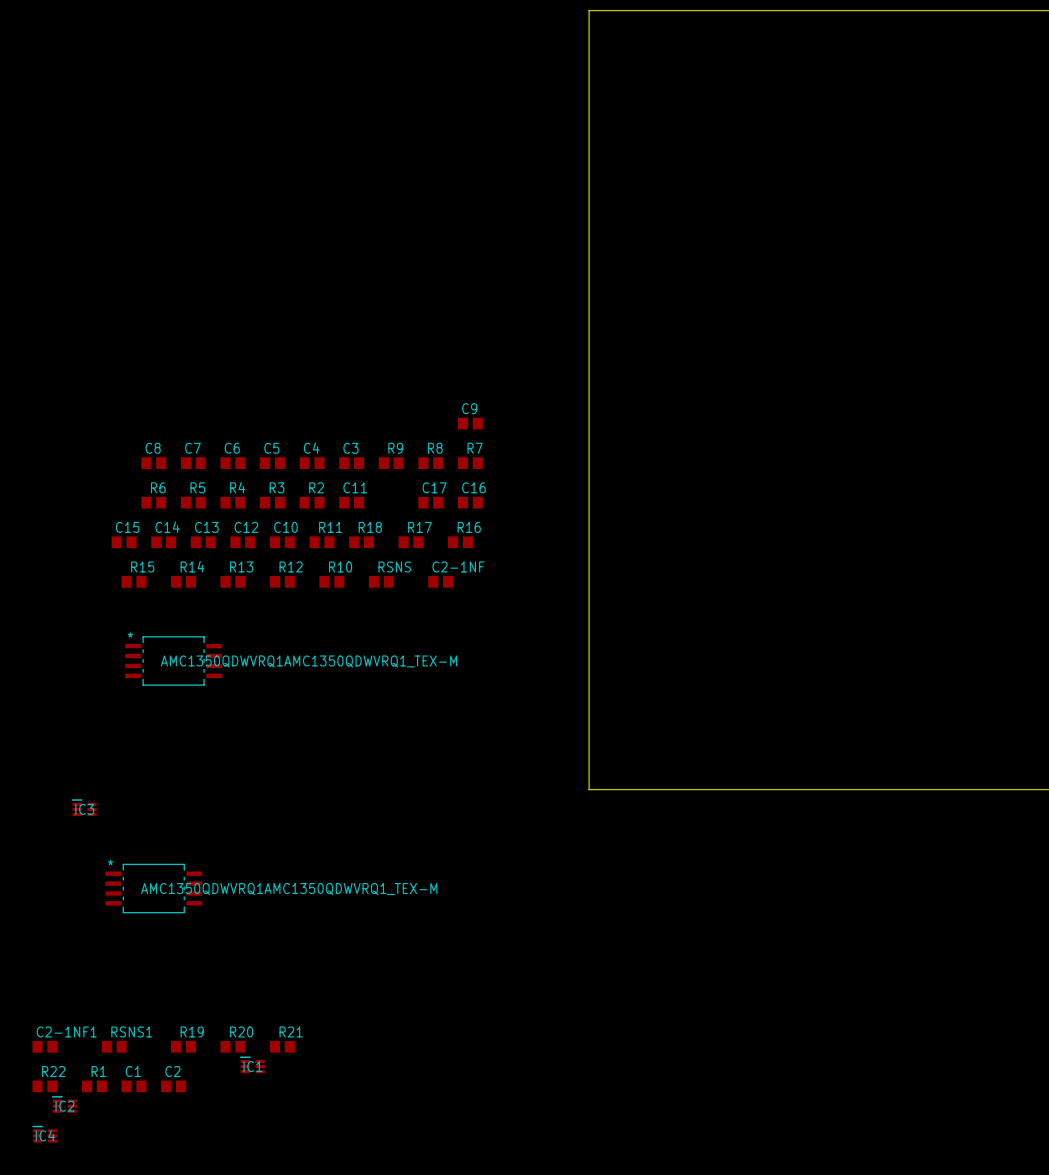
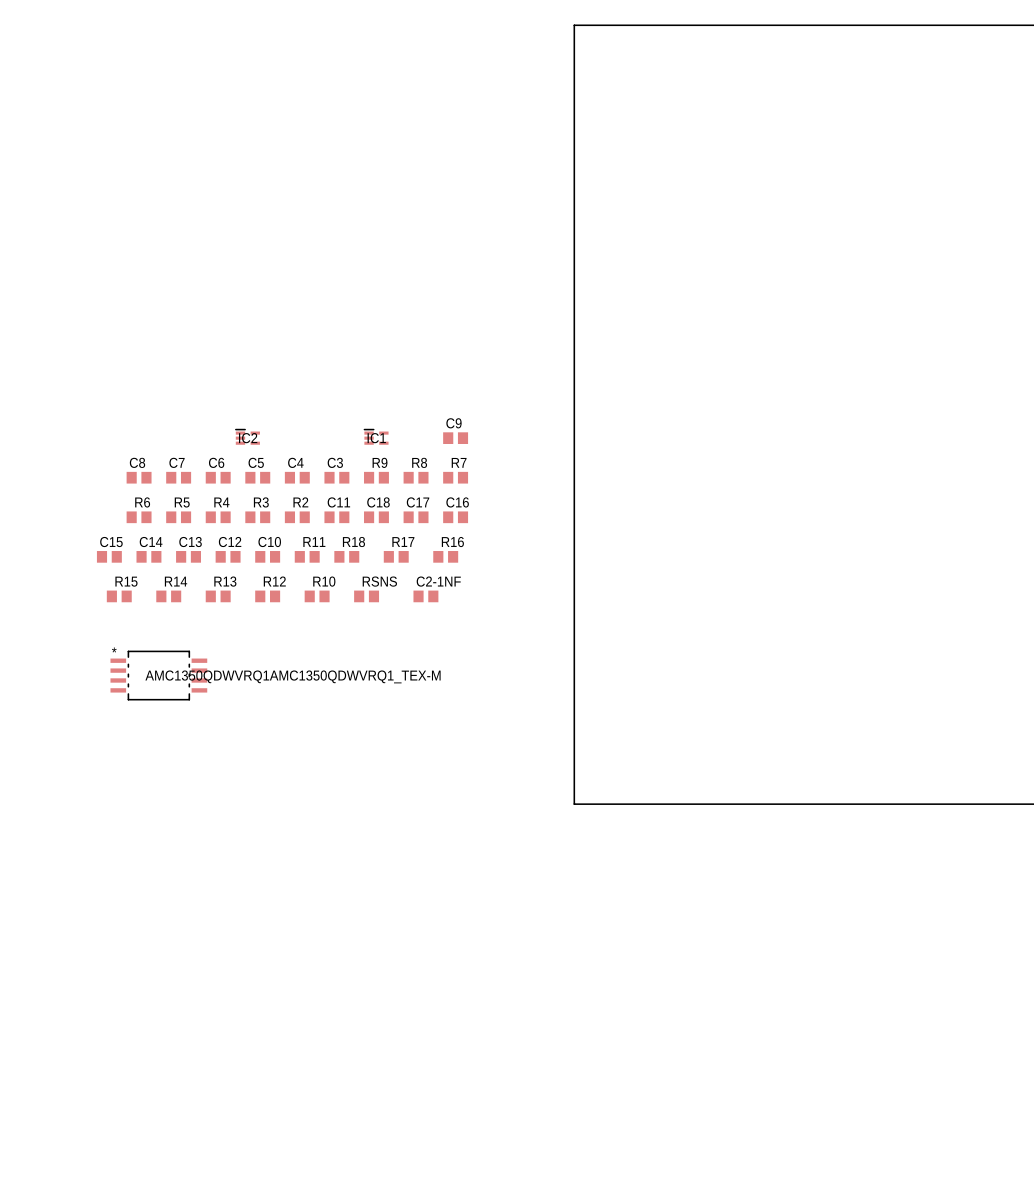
C18: none -> (376, 517)
IC3: (84, 807) -> none
part: AMC1350QDWVRQ1AMC1350QDWVRQ1_TEX-M (153, 888) -> none
C2-1NF1: (44, 1046) -> none
RSNS1: (114, 1046) -> none
R19: (183, 1046) -> none
R20: (232, 1046) -> none
R21: (282, 1046) -> none
IC1 footprint: [239, 1056, 265, 1074] -> [363, 428, 389, 445]
R22: (44, 1086) -> none
R1: (94, 1086) -> none
C1: (134, 1086) -> none
C2: (173, 1086) -> none
IC2 footprint: [51, 1096, 77, 1113] -> [235, 428, 260, 445]
IC4: (44, 1134) -> none

